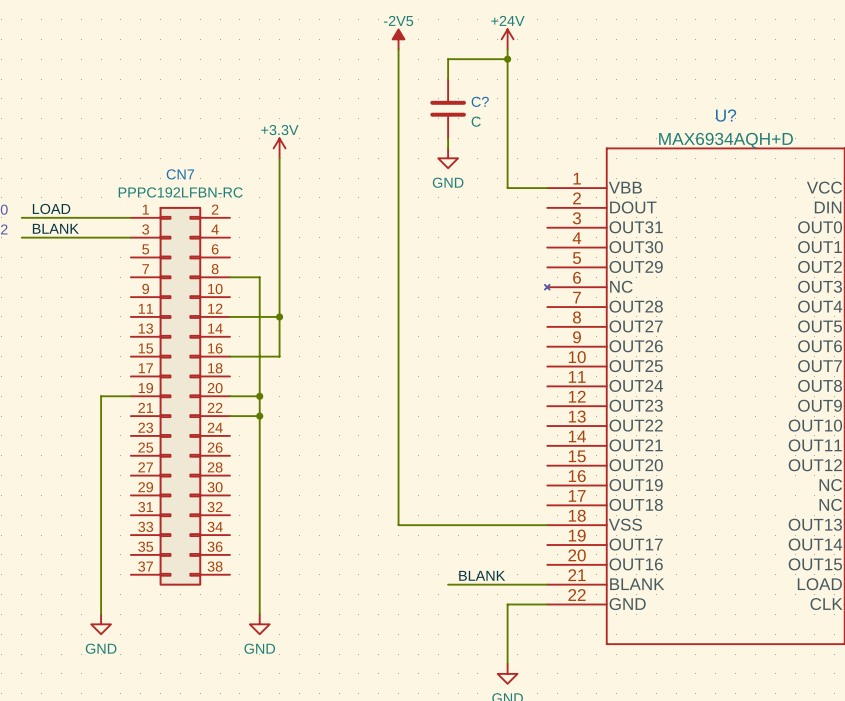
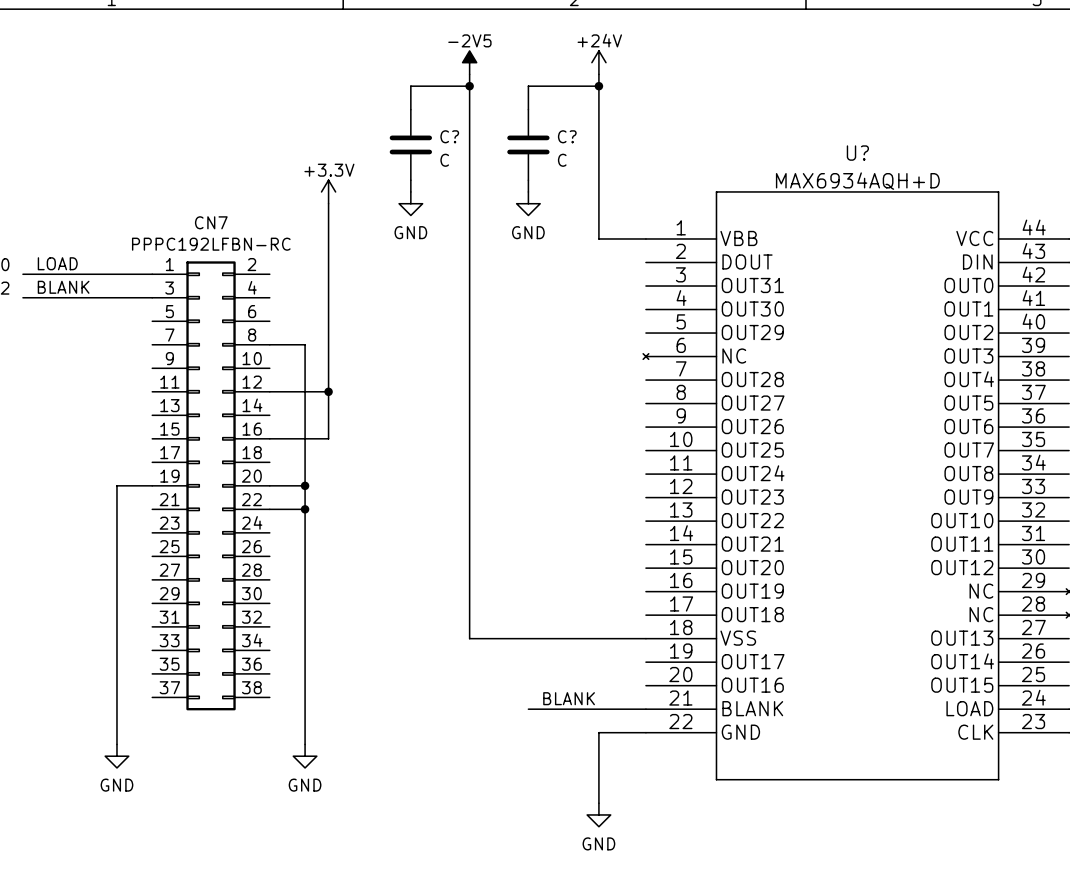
wire: none -> (469, 86) (410, 86) (410, 109)
junction: none -> (469, 86)
C?: none -> C (410, 144)
wire: none -> (410, 180) (410, 191)
power symbol: none -> GND (410, 203)

